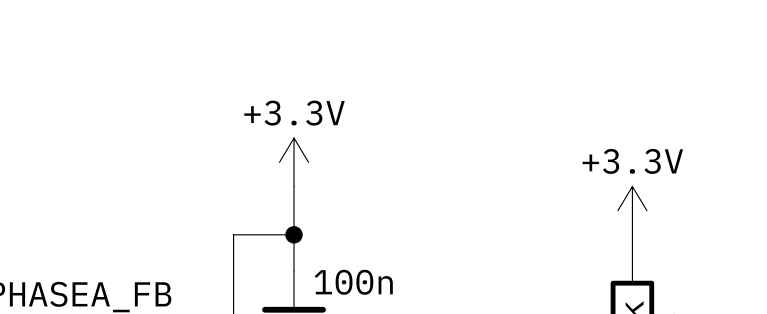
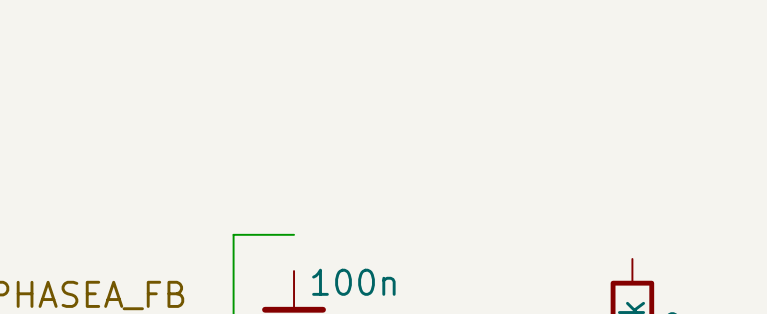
power symbol: +3.3V (294, 162) -> none
wire: (294, 186) (294, 271) -> none
power symbol: +3.3V (632, 210) -> none
junction: (294, 234) -> none
wire: (632, 234) (632, 259) -> none

